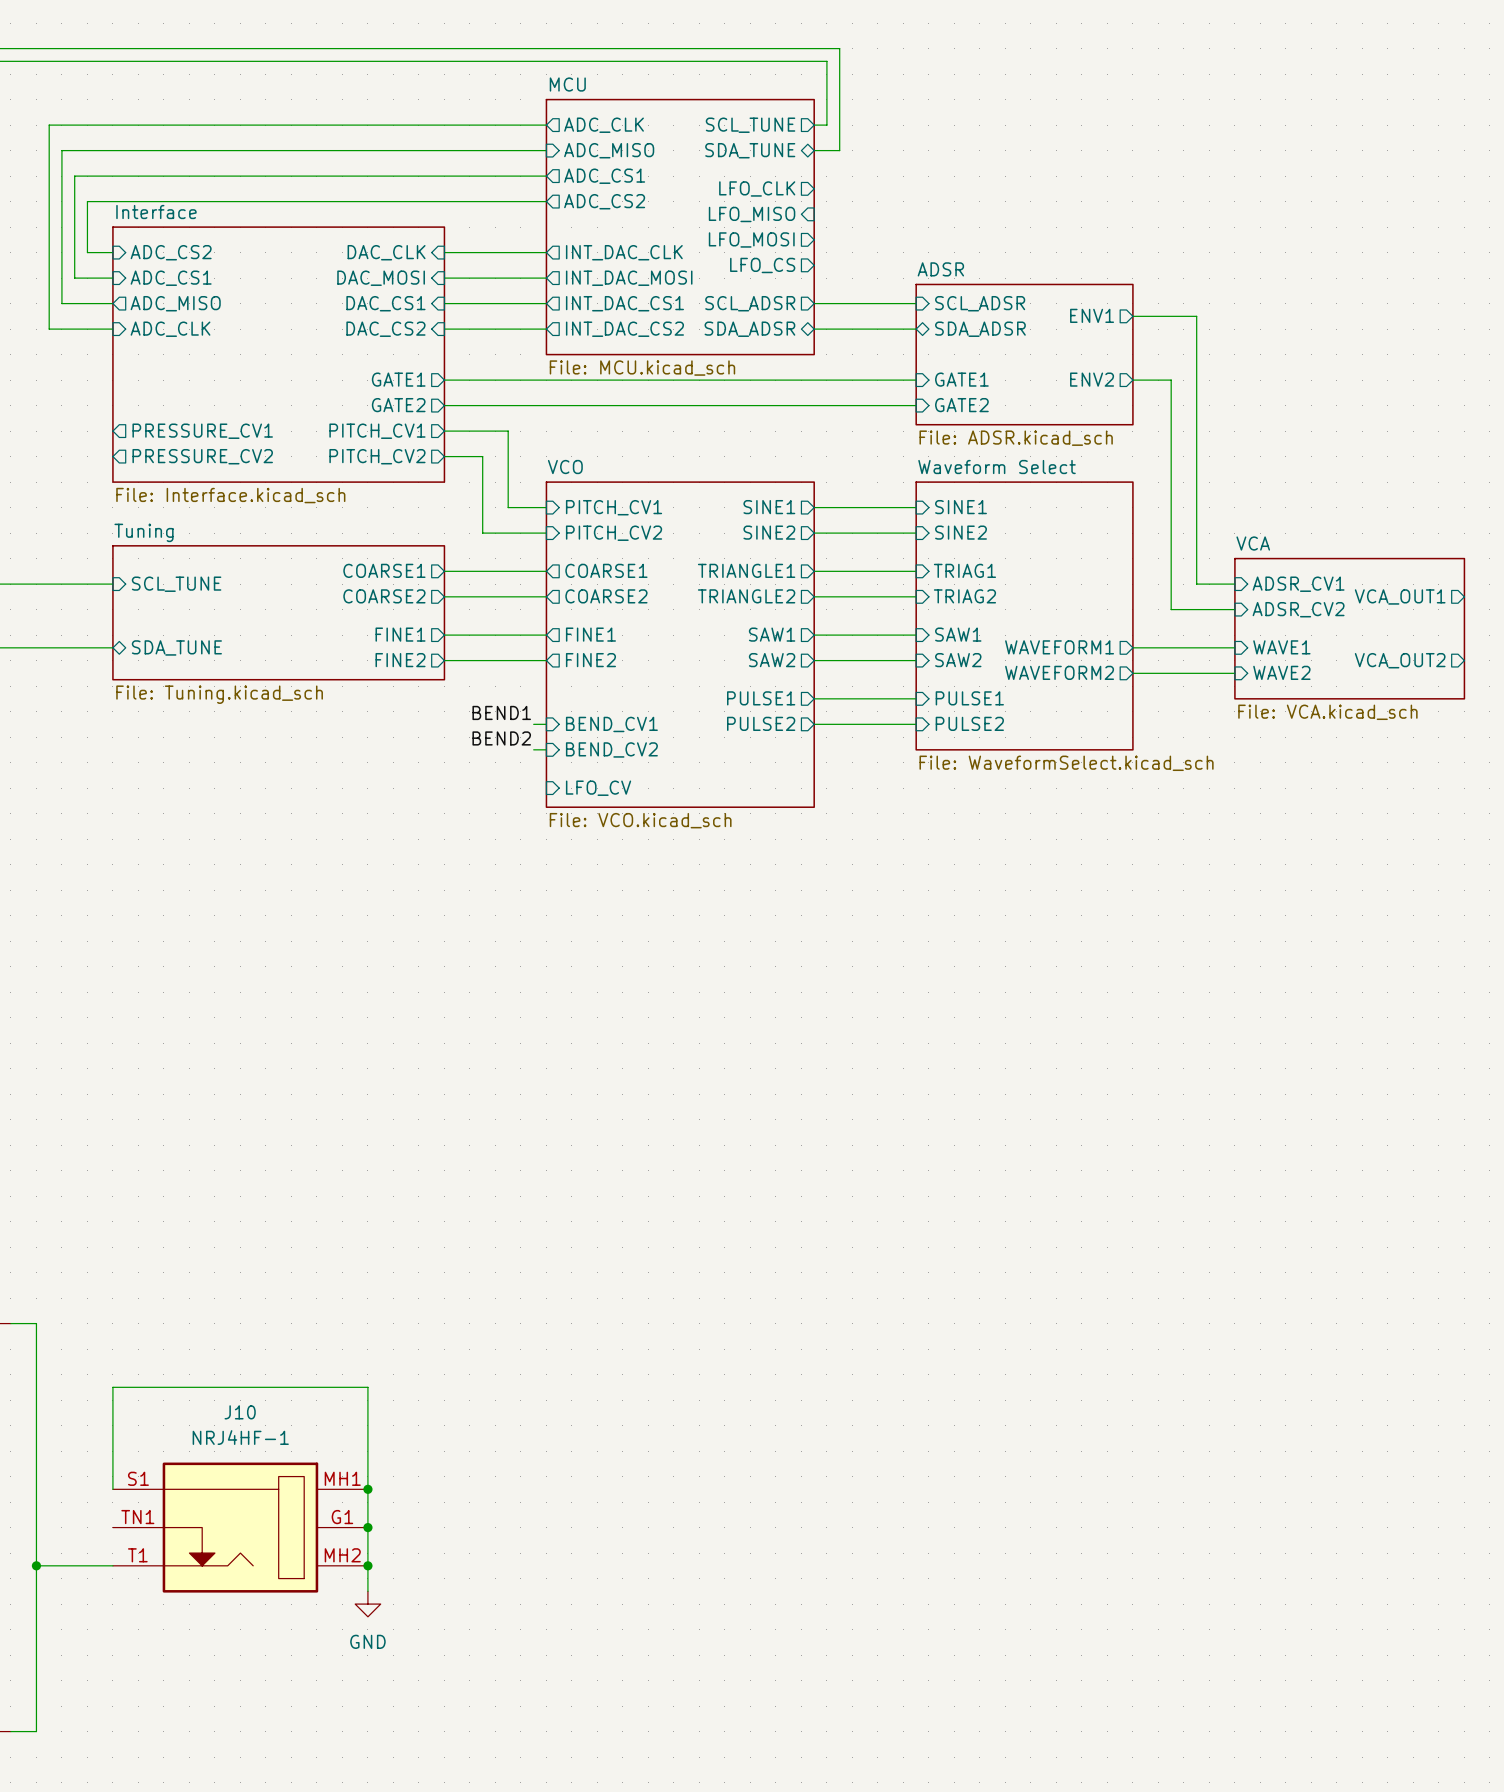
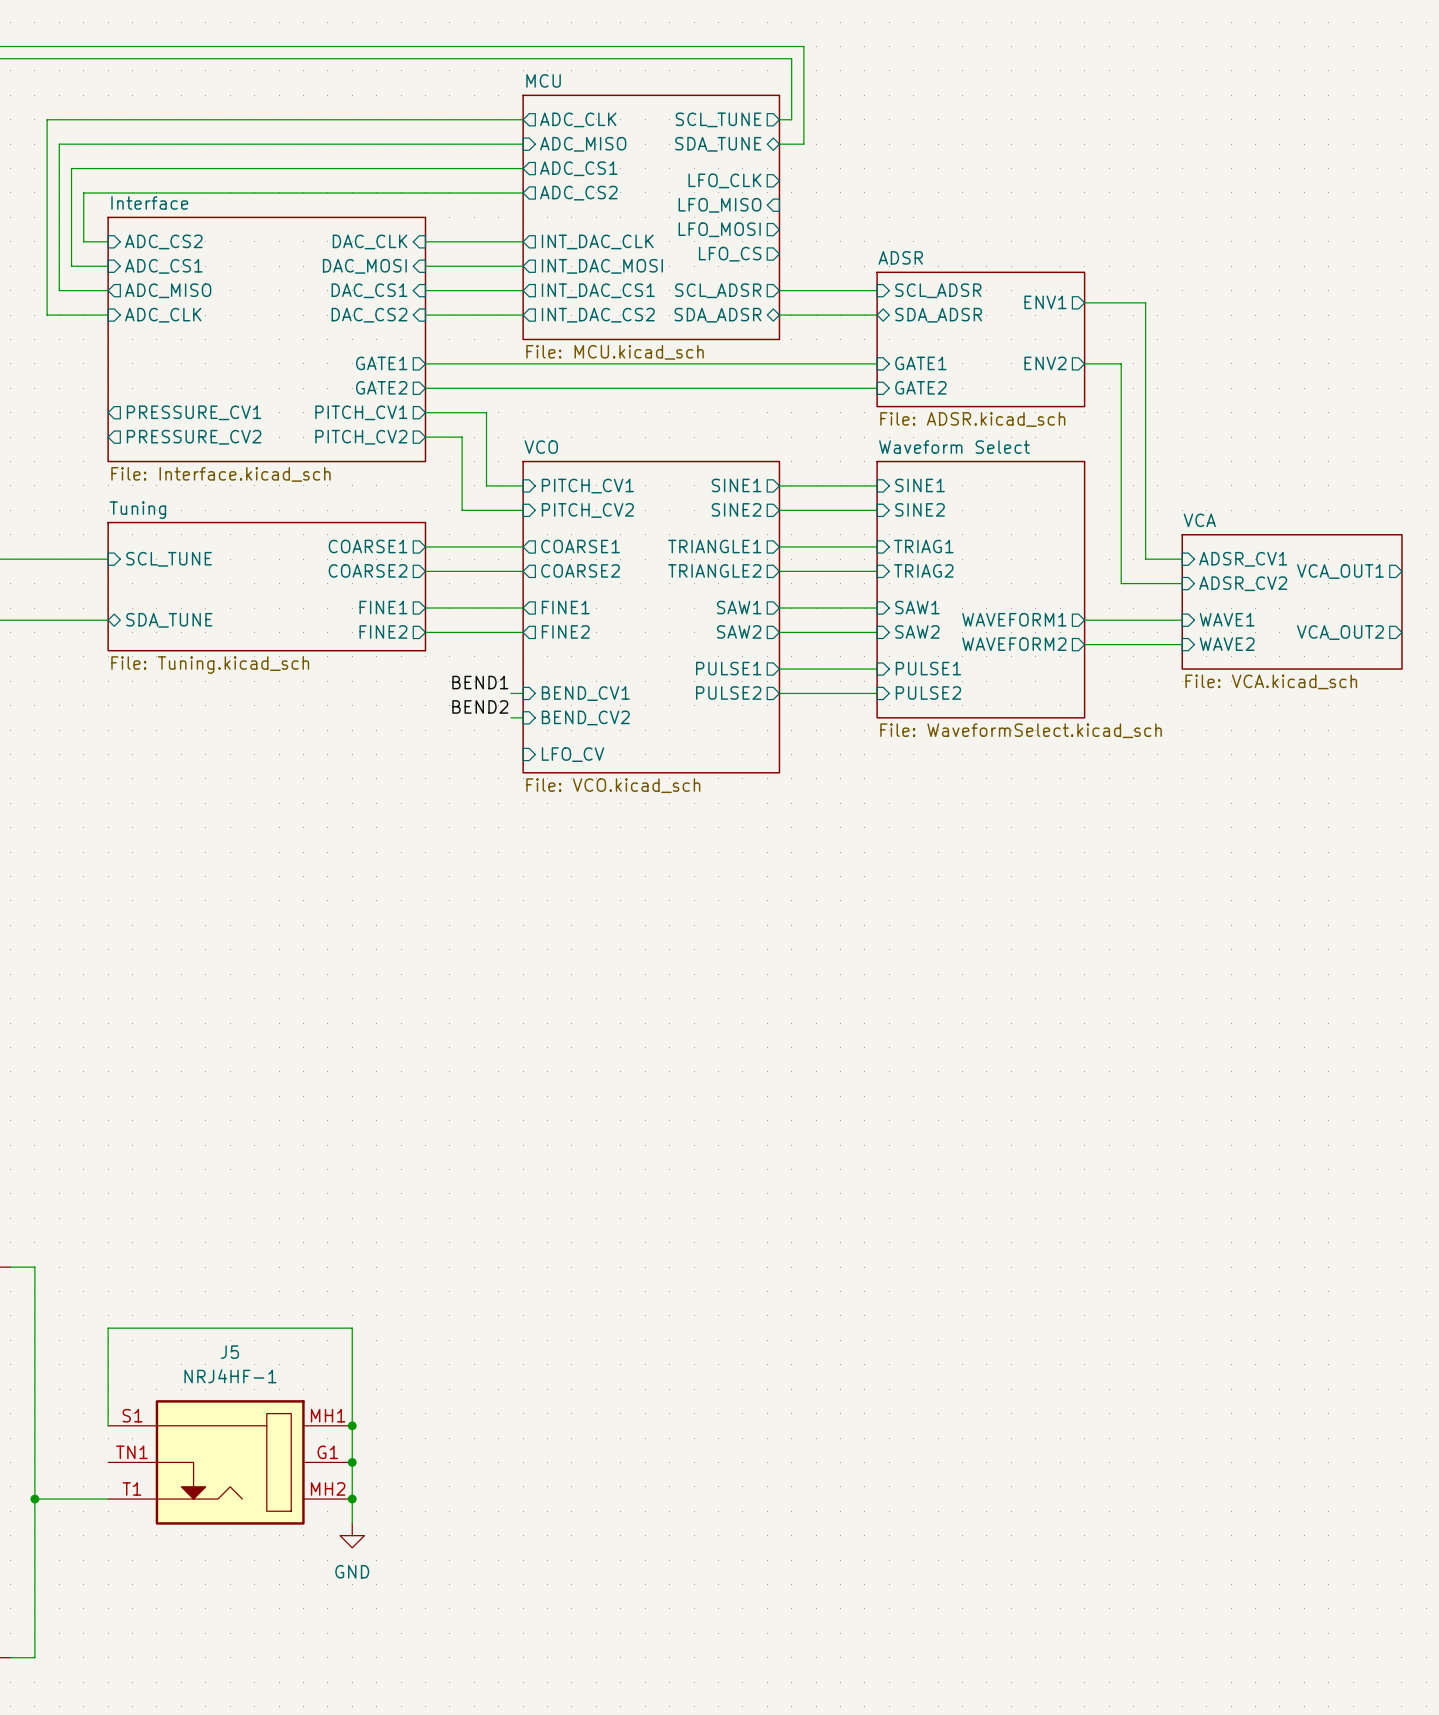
J10 name: J10 (240, 1412) -> J5 (229, 1352)

